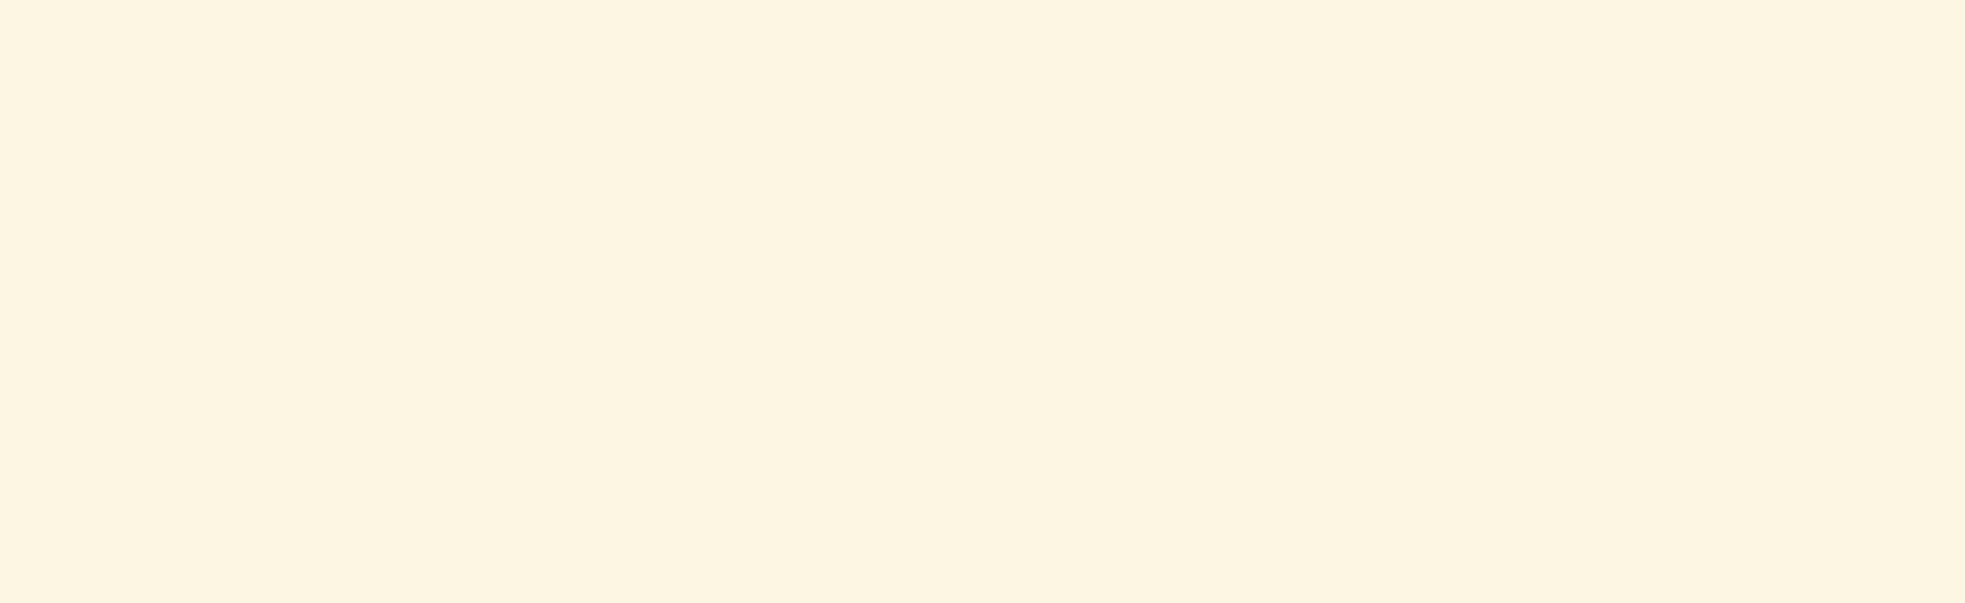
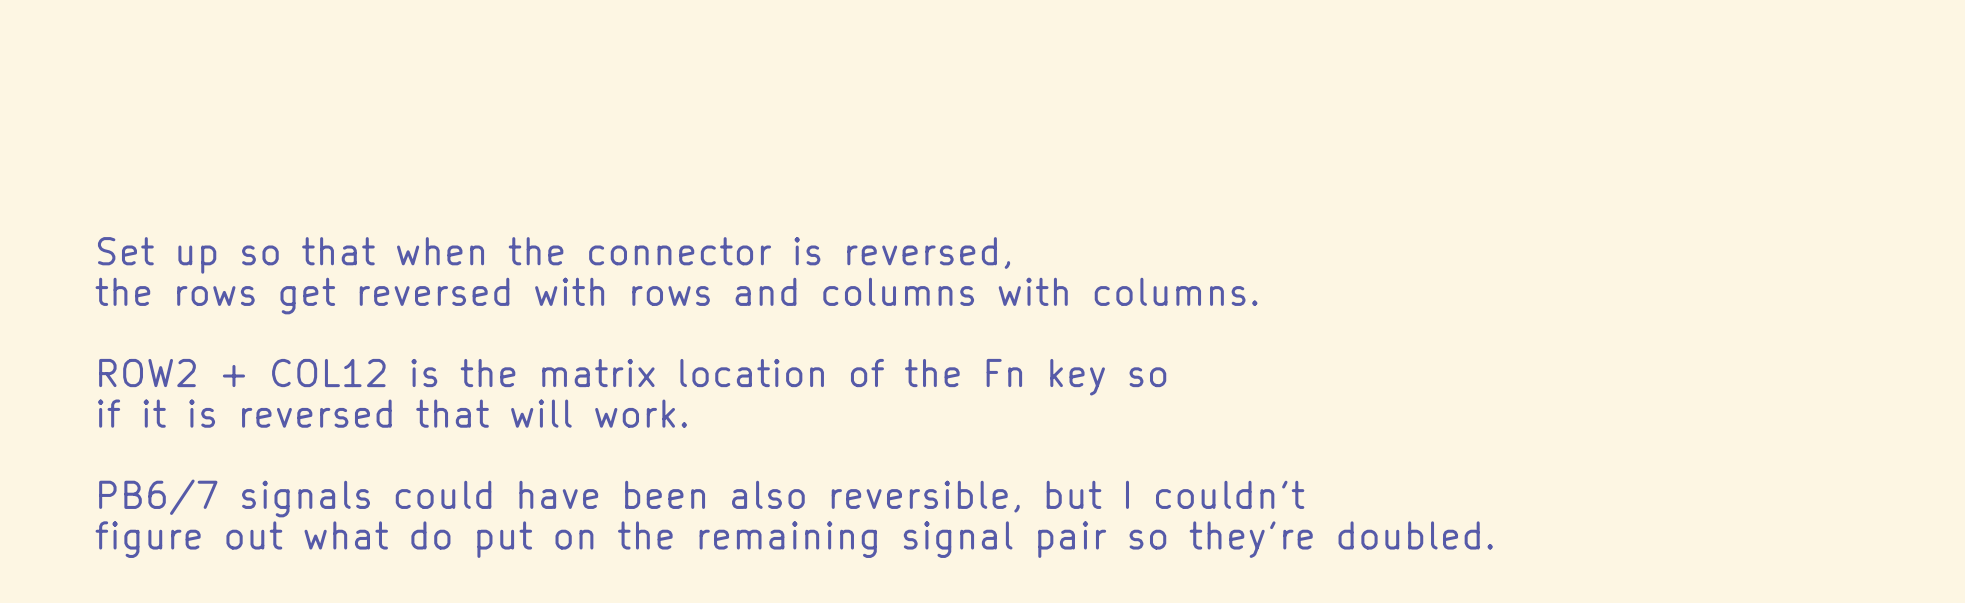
text: none -> Set up so that when the connector is reversed, (554, 255)
text: none -> the rows get reversed with rows and columns with columns. (676, 296)
text: none -> ROW2 + COL12 is the matrix location of the Fn key so (632, 377)
text: none -> if it is reversed that will work. (392, 413)
text: none -> PB6/7 signals could have been also reversible, but I couldn't (701, 498)
text: none -> figure out what do put on the remaining signal pair so they're doubled. (794, 539)

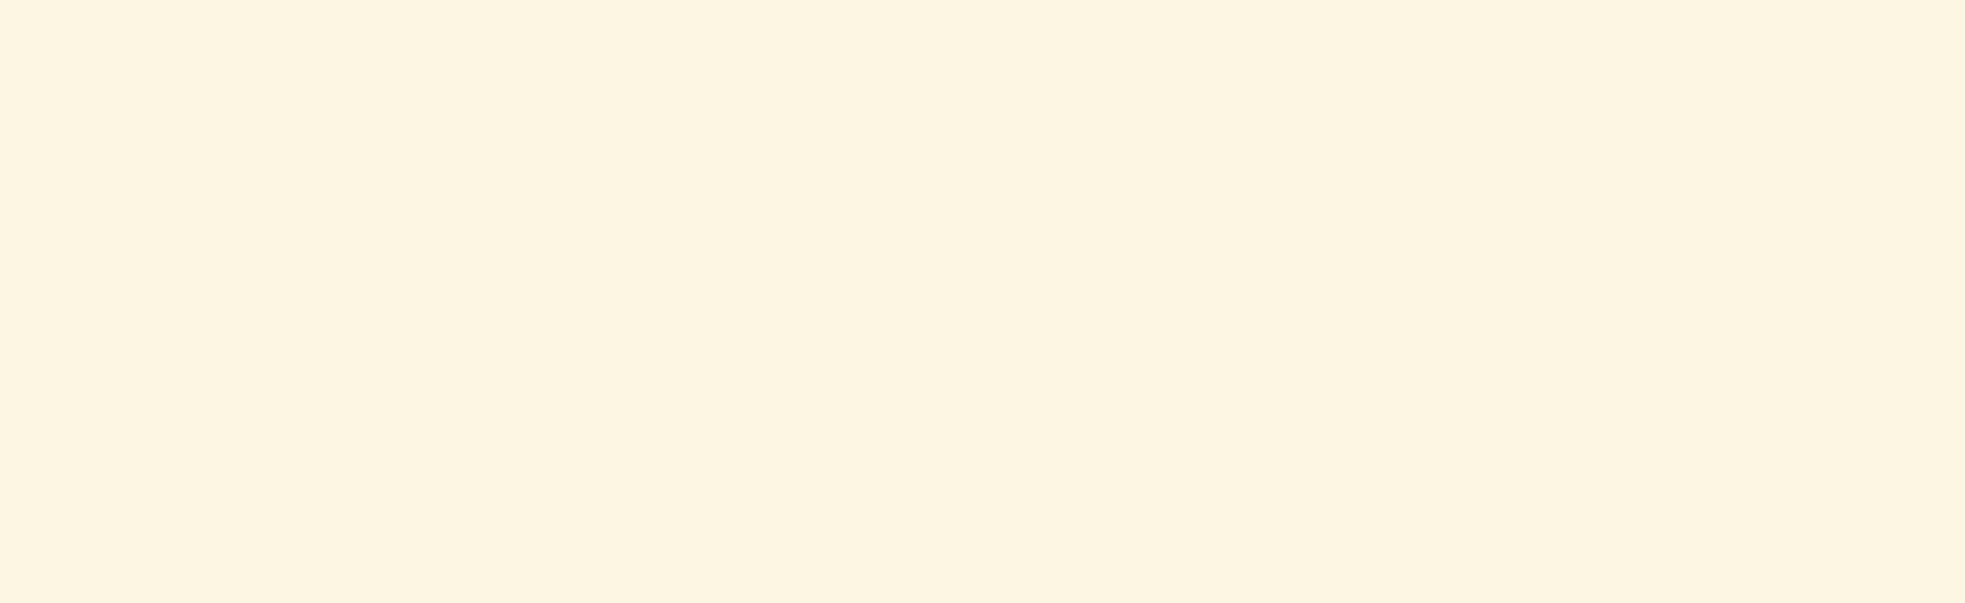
text: Set up so that when the connector is reversed, (554, 255) -> none
text: the rows get reversed with rows and columns with columns. (676, 296) -> none
text: ROW2 + COL12 is the matrix location of the Fn key so (632, 377) -> none
text: if it is reversed that will work. (392, 413) -> none
text: PB6/7 signals could have been also reversible, but I couldn't (701, 498) -> none
text: figure out what do put on the remaining signal pair so they're doubled. (794, 539) -> none

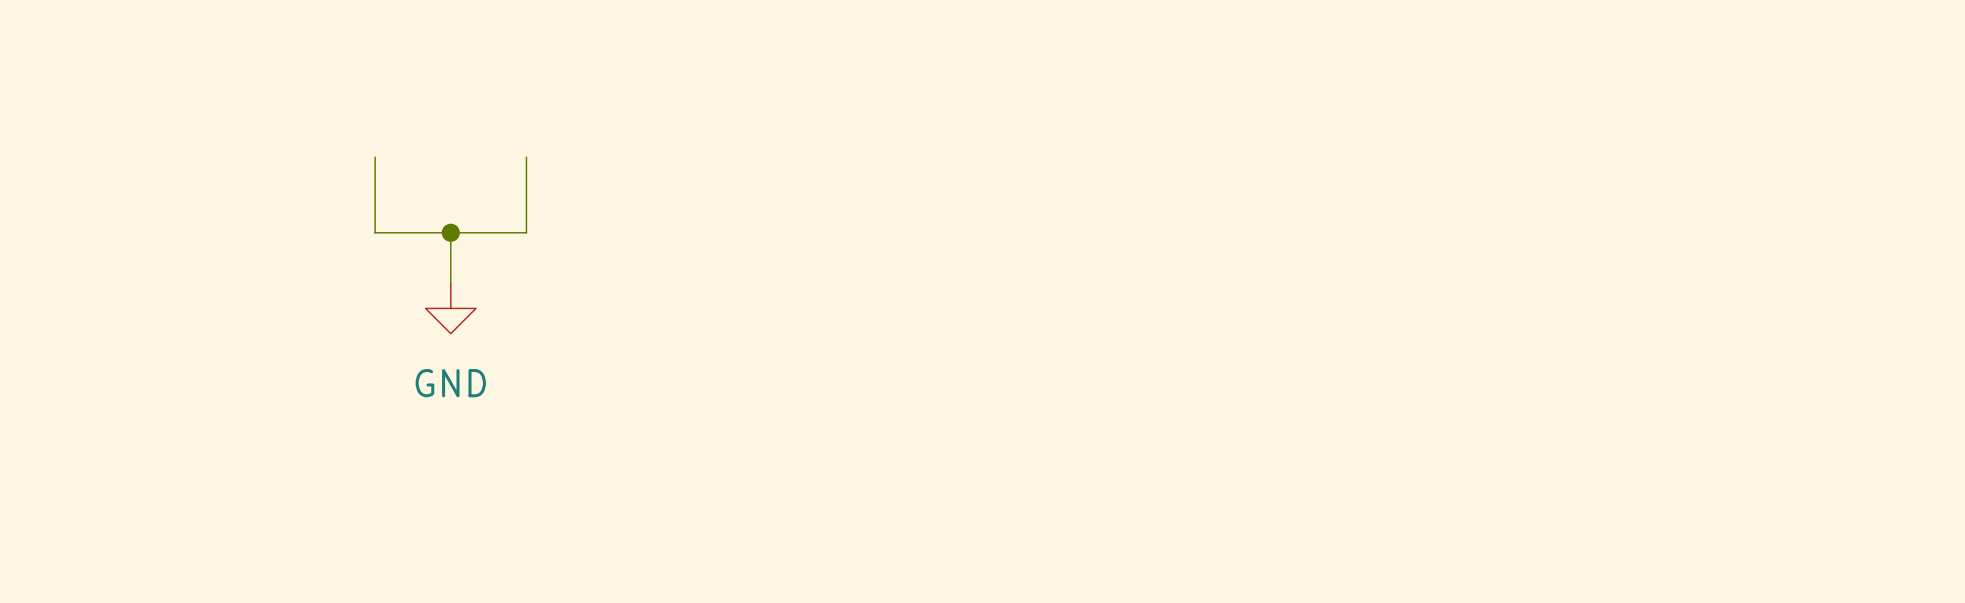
wire: none -> (375, 157) (375, 232) (526, 232) (526, 157)
wire: none -> (450, 232) (450, 283)
junction: none -> (450, 232)
power symbol: none -> GND (450, 308)

